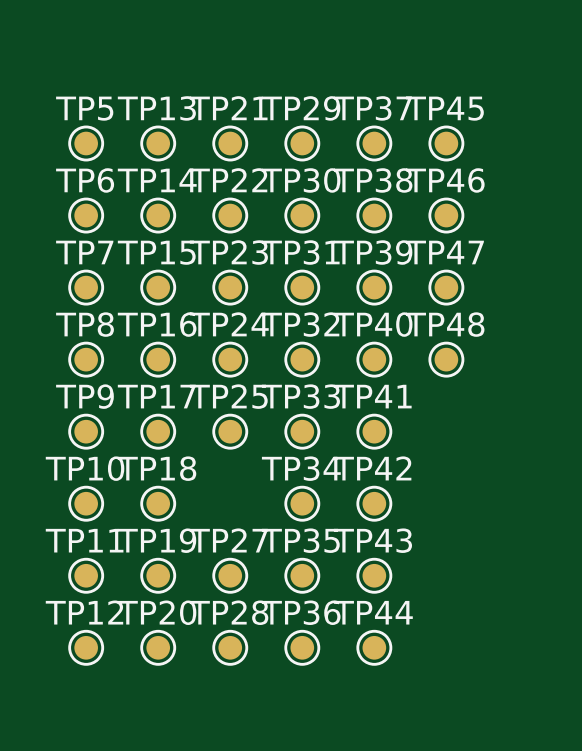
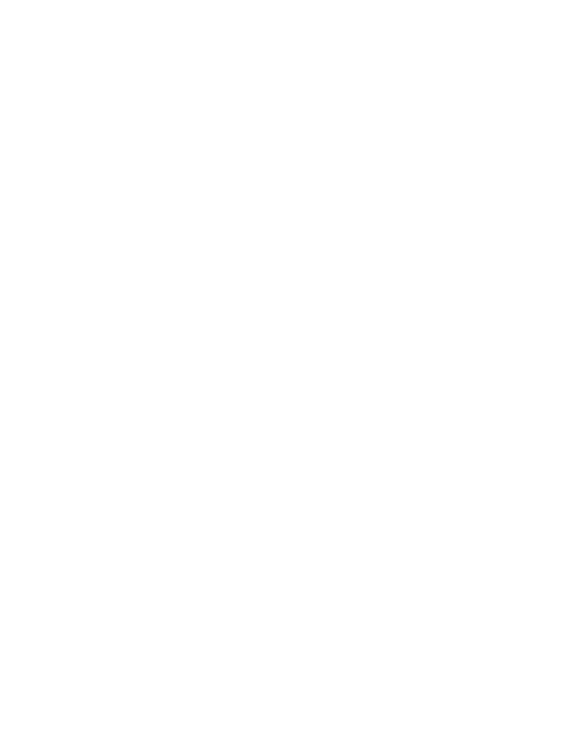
TP5: (86, 143) -> none
TP13: (158, 143) -> none
TP21: (230, 143) -> none
TP29: (302, 143) -> none
TP37: (374, 143) -> none
TP45: (446, 143) -> none
TP6: (86, 215) -> none
TP14: (158, 215) -> none
TP22: (230, 215) -> none
TP30: (302, 215) -> none
TP38: (374, 215) -> none
TP46: (446, 215) -> none
TP7: (86, 287) -> none
TP15: (158, 287) -> none
TP23: (230, 287) -> none
TP31: (302, 287) -> none
TP39: (374, 287) -> none
TP47: (446, 287) -> none
TP8: (86, 359) -> none
TP16: (158, 359) -> none
TP24: (230, 359) -> none
TP32: (302, 359) -> none
TP40: (374, 359) -> none
TP48: (446, 359) -> none
TP9: (86, 431) -> none
TP17: (158, 431) -> none
TP25: (230, 431) -> none
TP33: (302, 431) -> none
TP41: (374, 431) -> none
TP10: (86, 503) -> none
TP18: (158, 503) -> none
TP34: (302, 503) -> none
TP42: (374, 503) -> none
TP11: (86, 575) -> none
TP19: (158, 575) -> none
TP27: (230, 575) -> none
TP35: (302, 575) -> none
TP43: (374, 575) -> none
TP12: (86, 647) -> none
TP20: (158, 647) -> none
TP28: (230, 647) -> none
TP36: (302, 647) -> none
TP44: (374, 647) -> none

